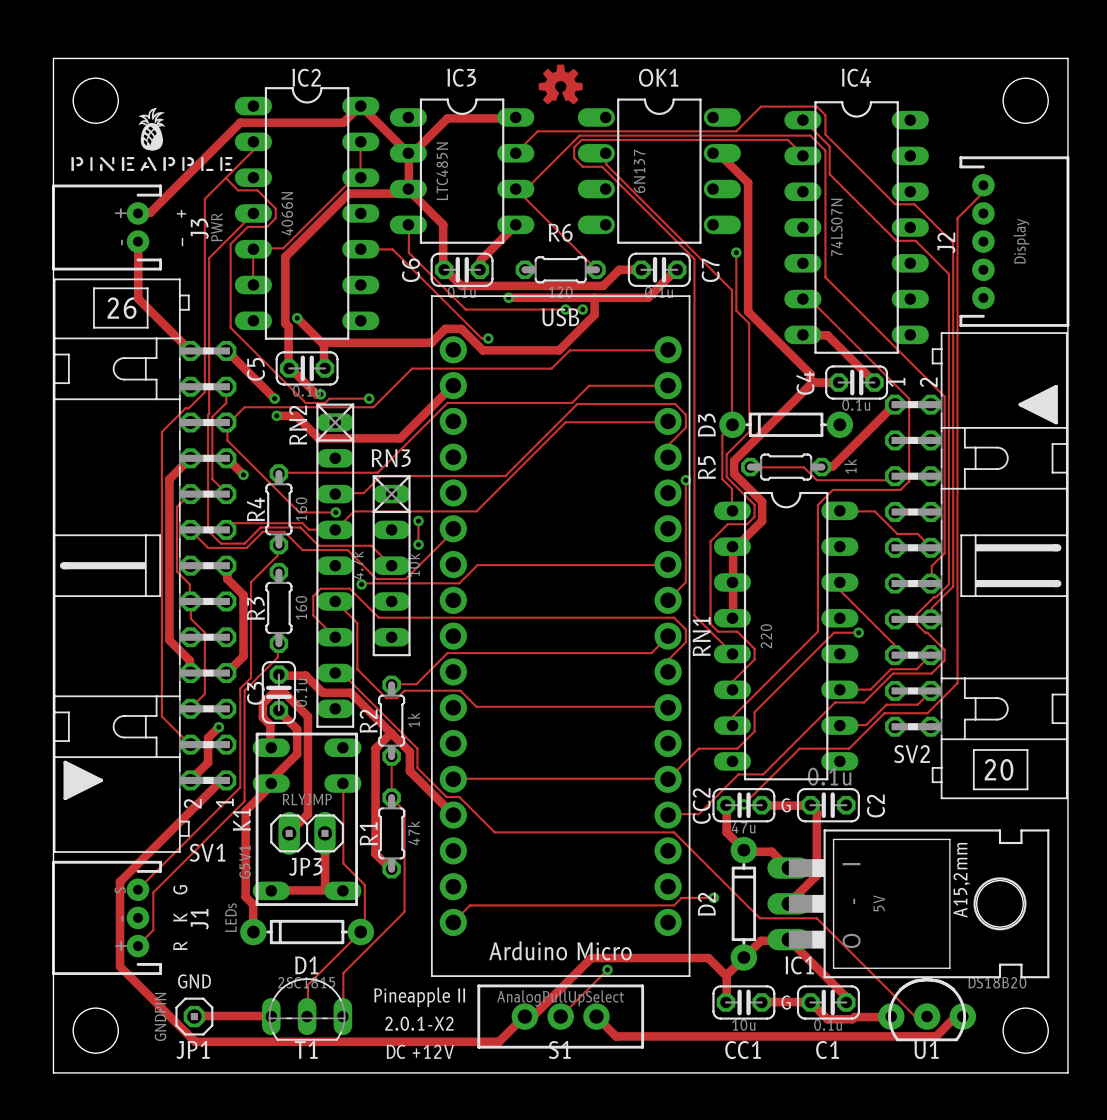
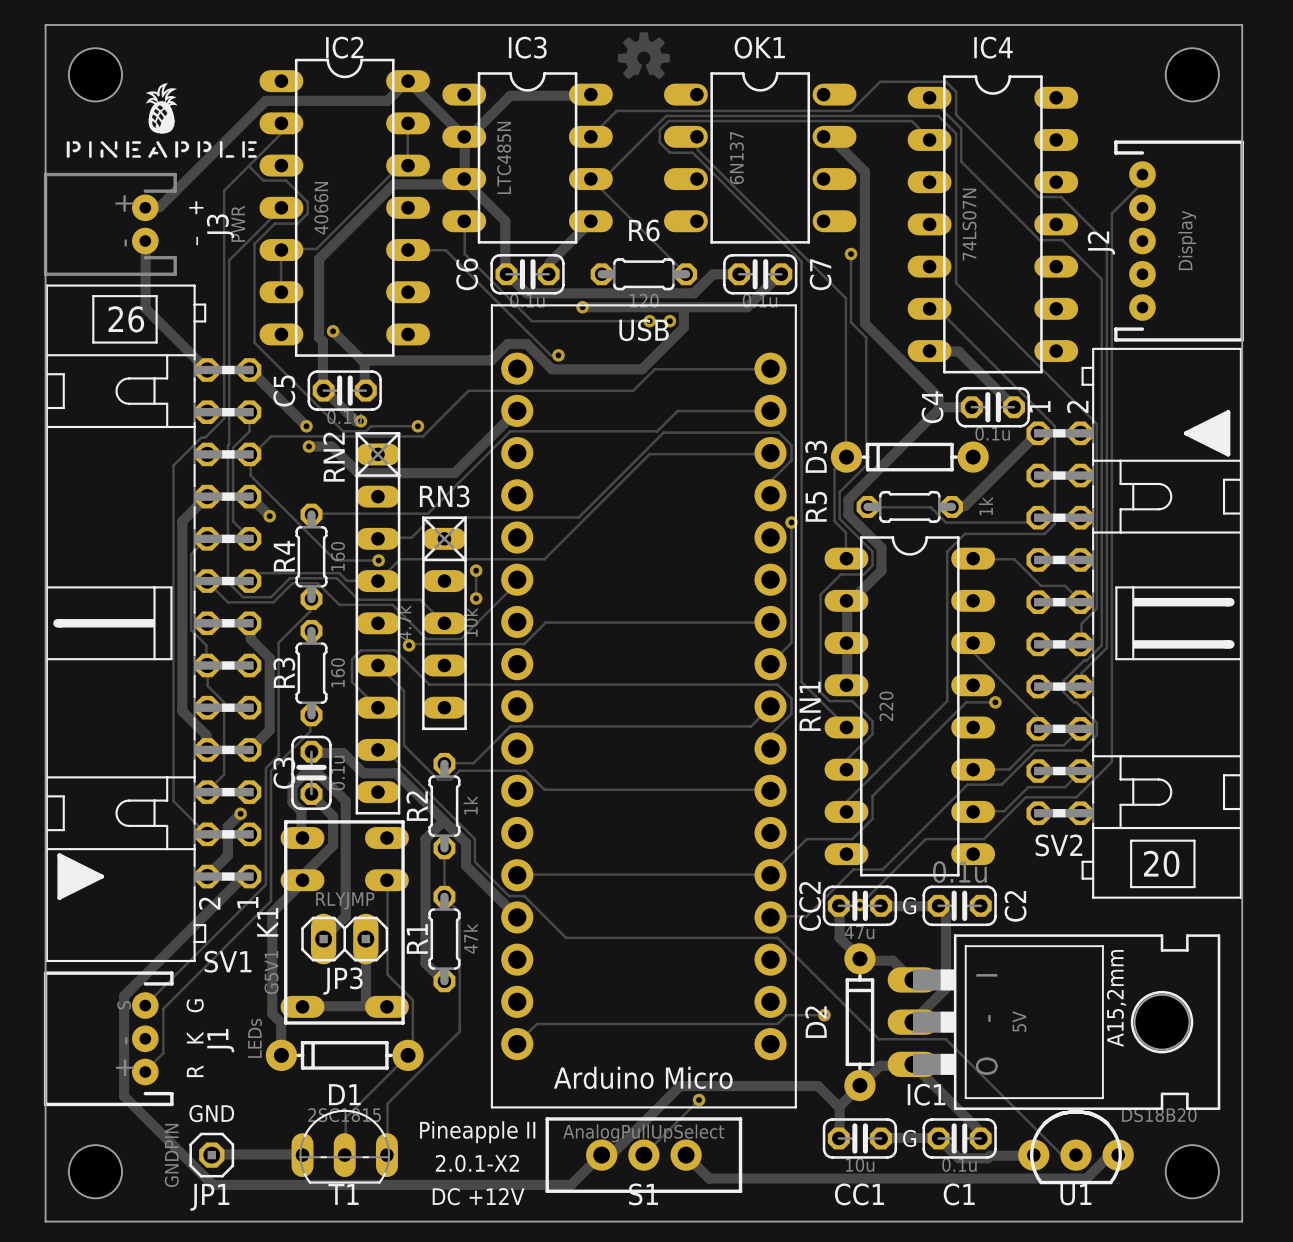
J3 footprint: [52, 184, 162, 271] -> [43, 172, 177, 276]

